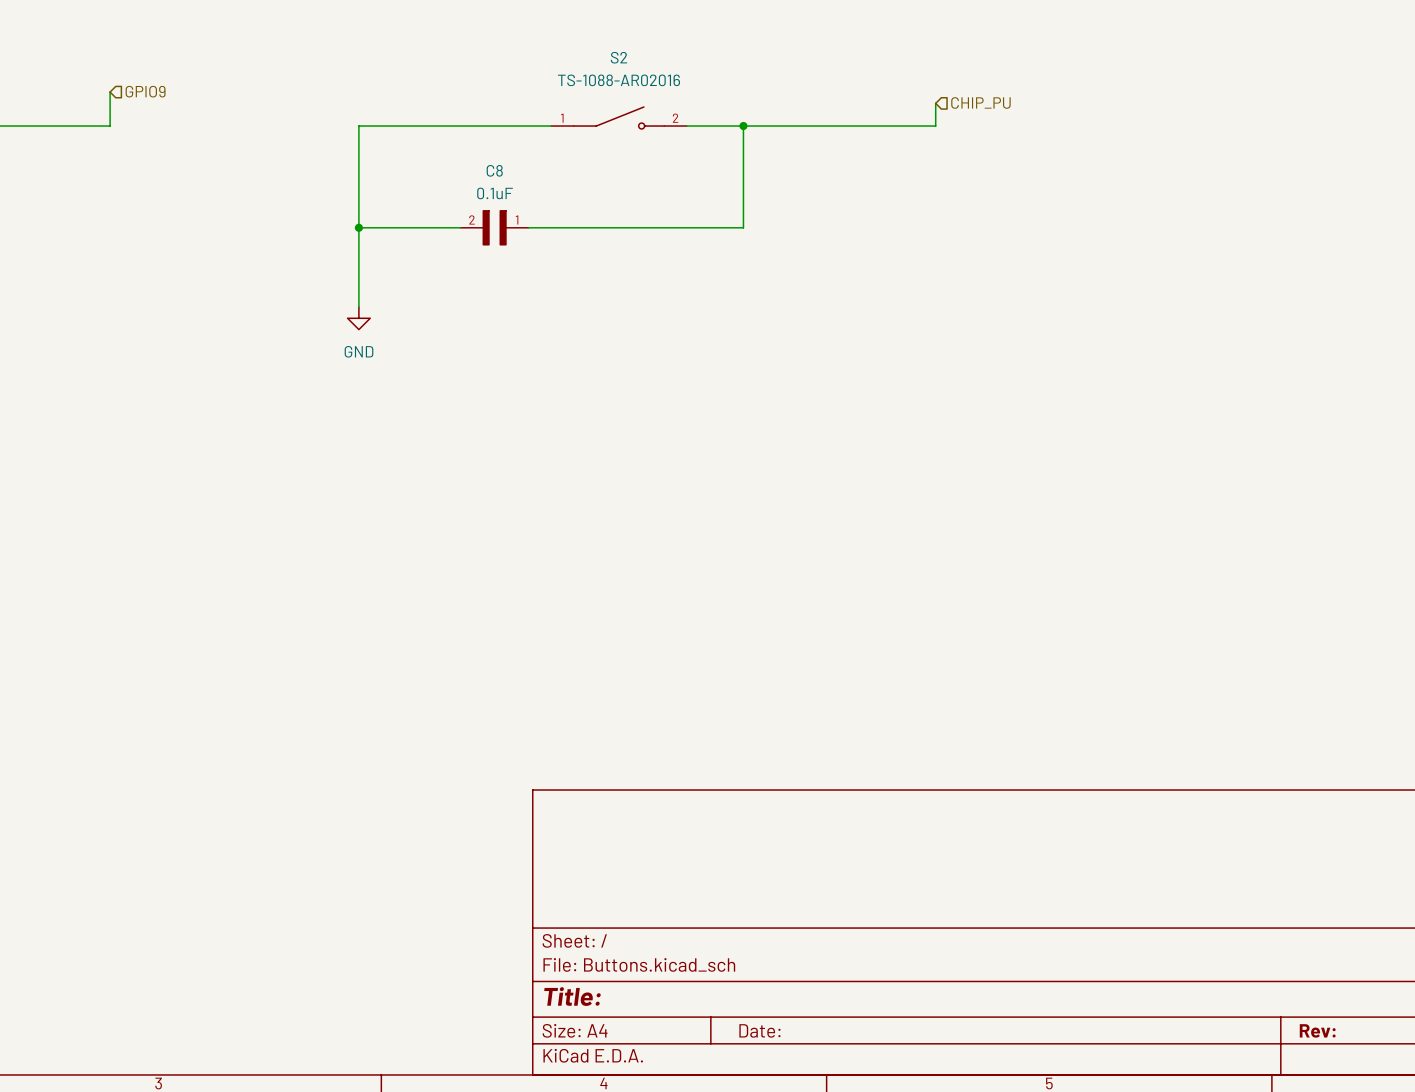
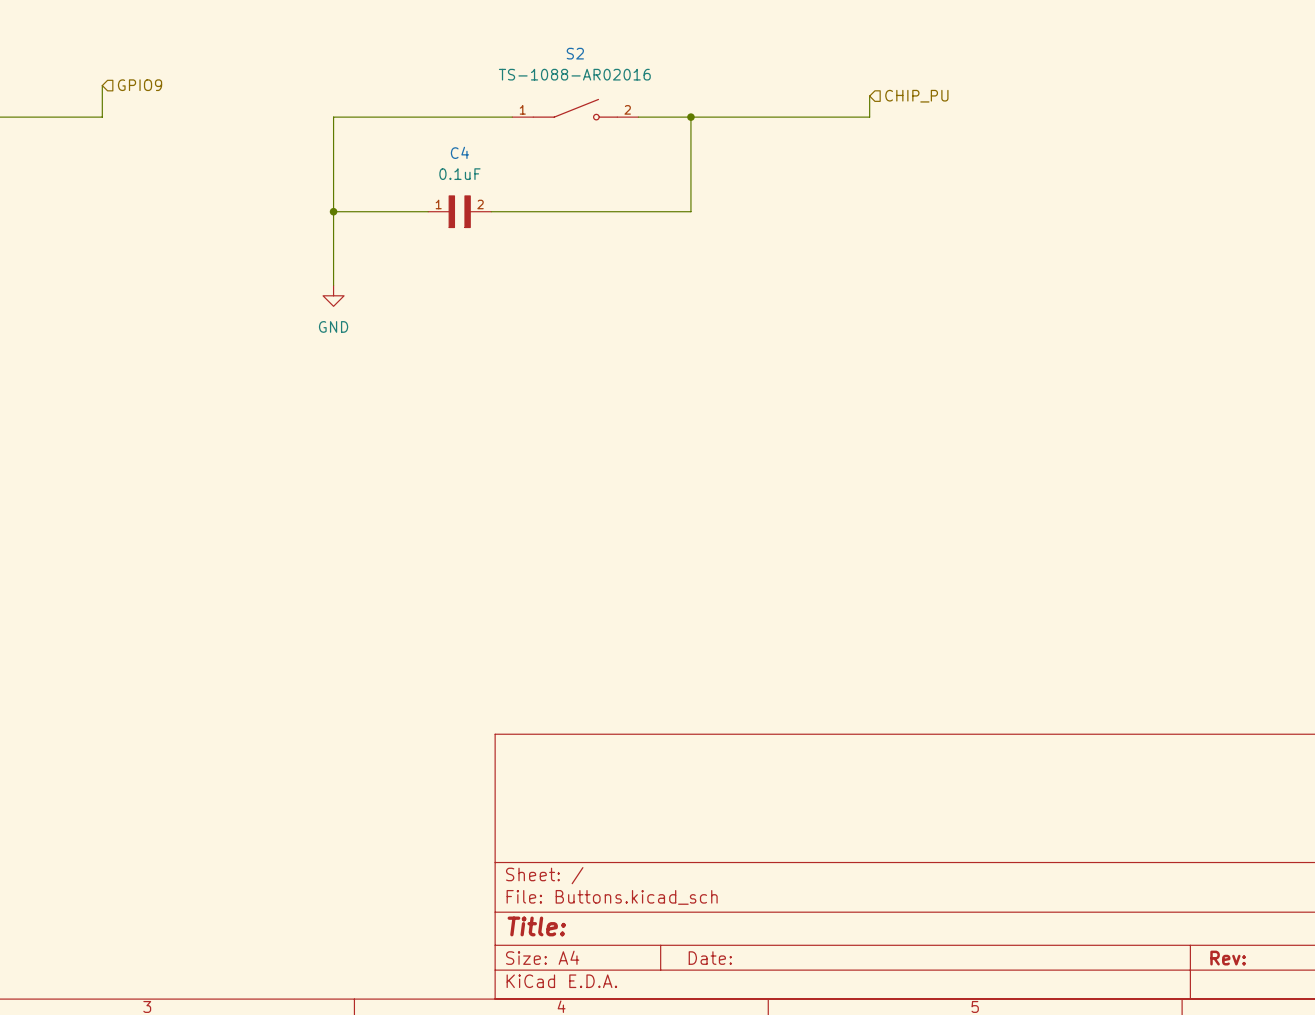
C8 name: C8 (494, 170) -> C4 (459, 152)
C8 rotation: 0° (494, 227) -> 180° (459, 211)

